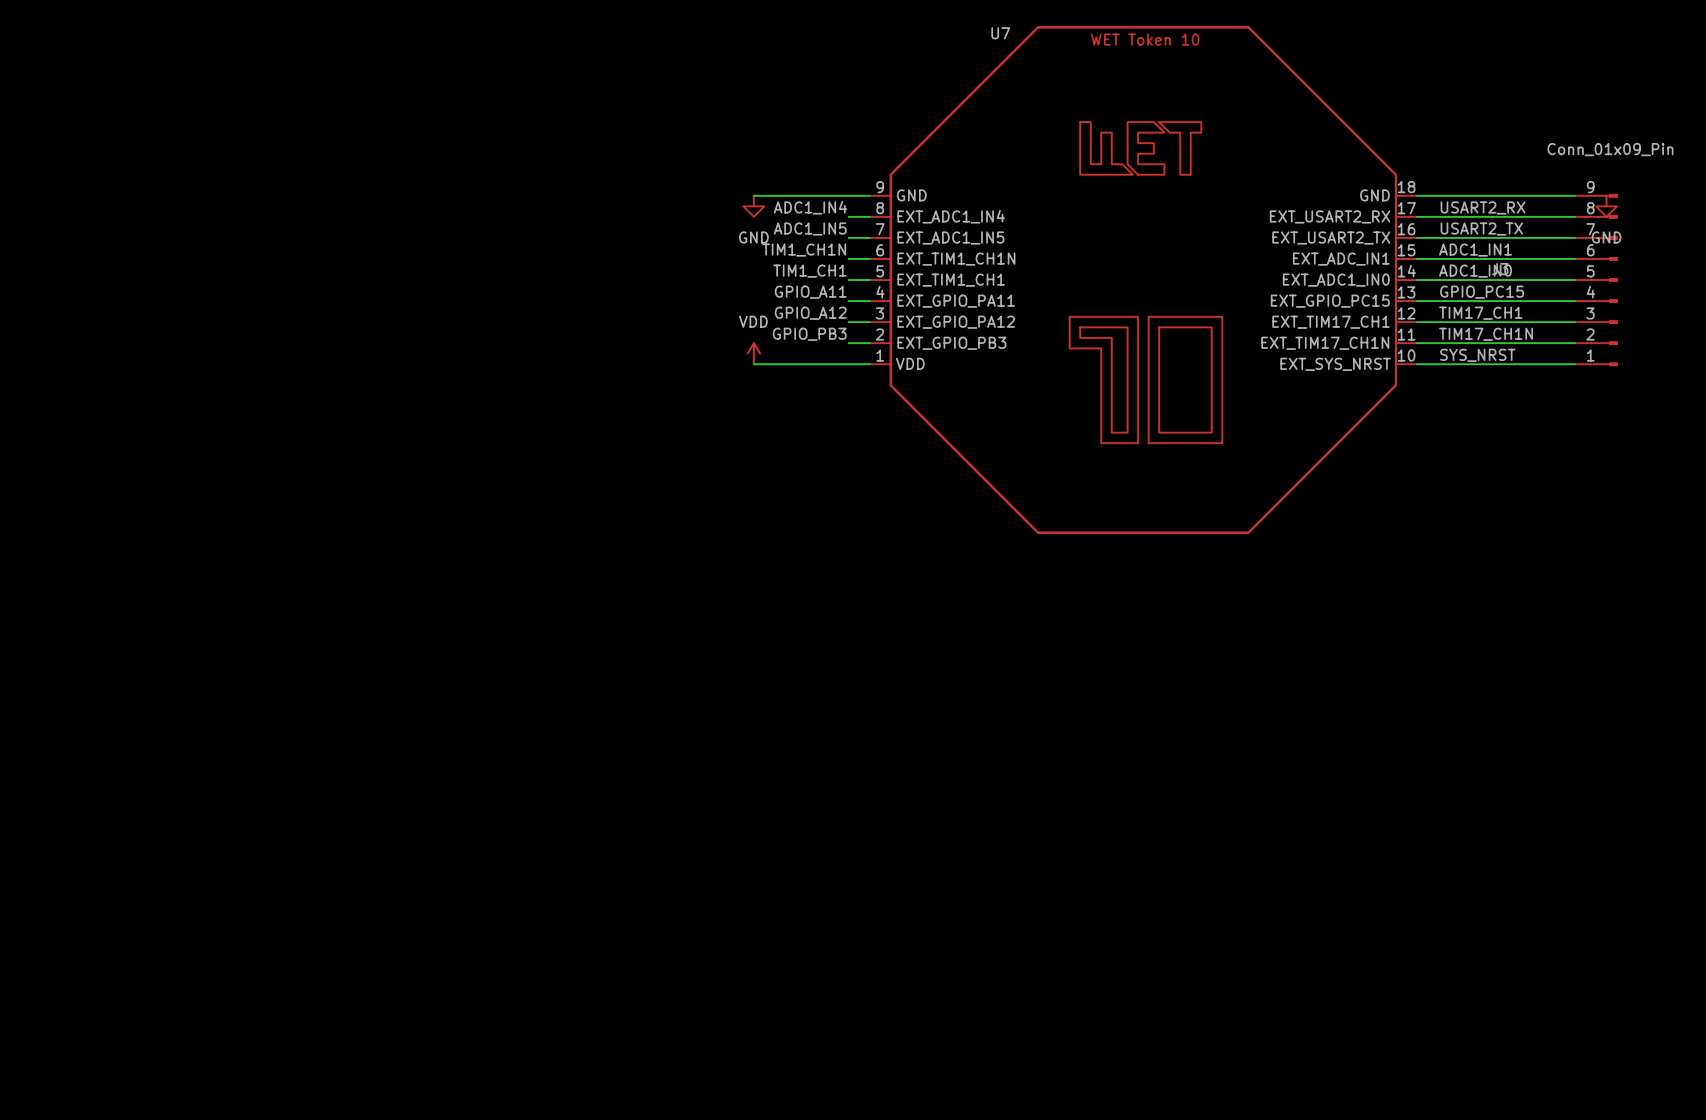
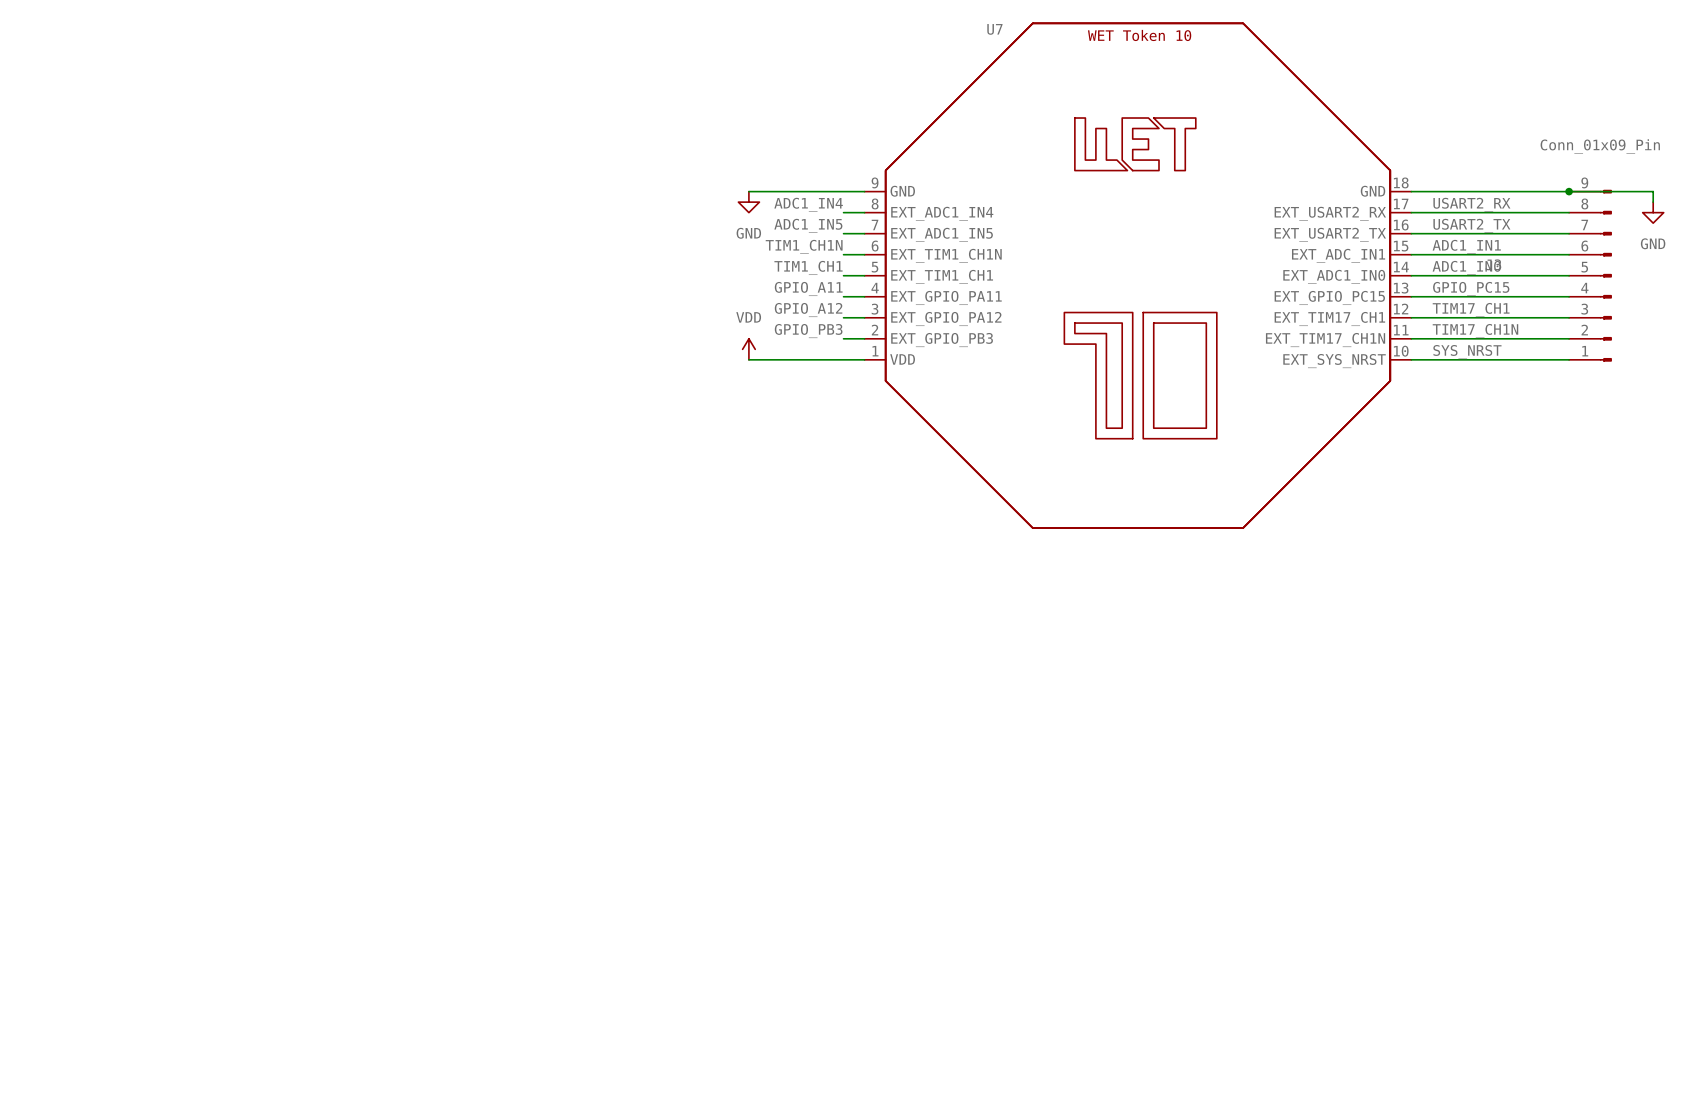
wire: none -> (1569, 191) (1653, 191) (1653, 202)
junction: none -> (1569, 191)
power symbol position: GND (1606, 206) -> GND (1653, 212)

